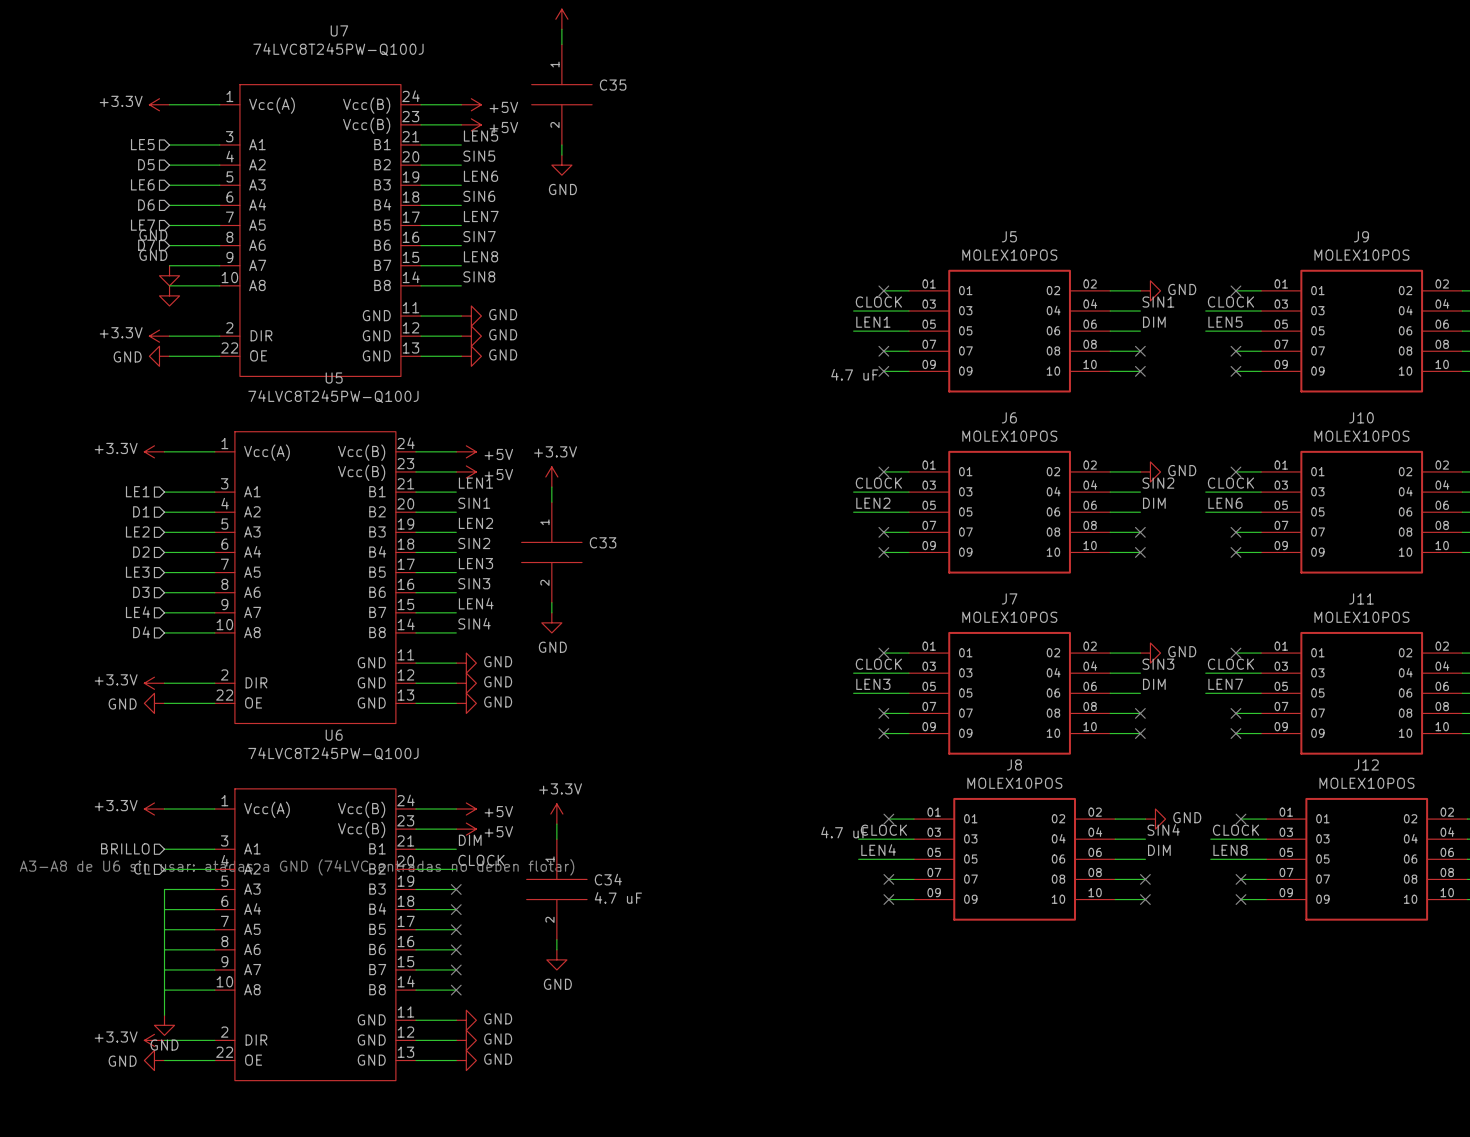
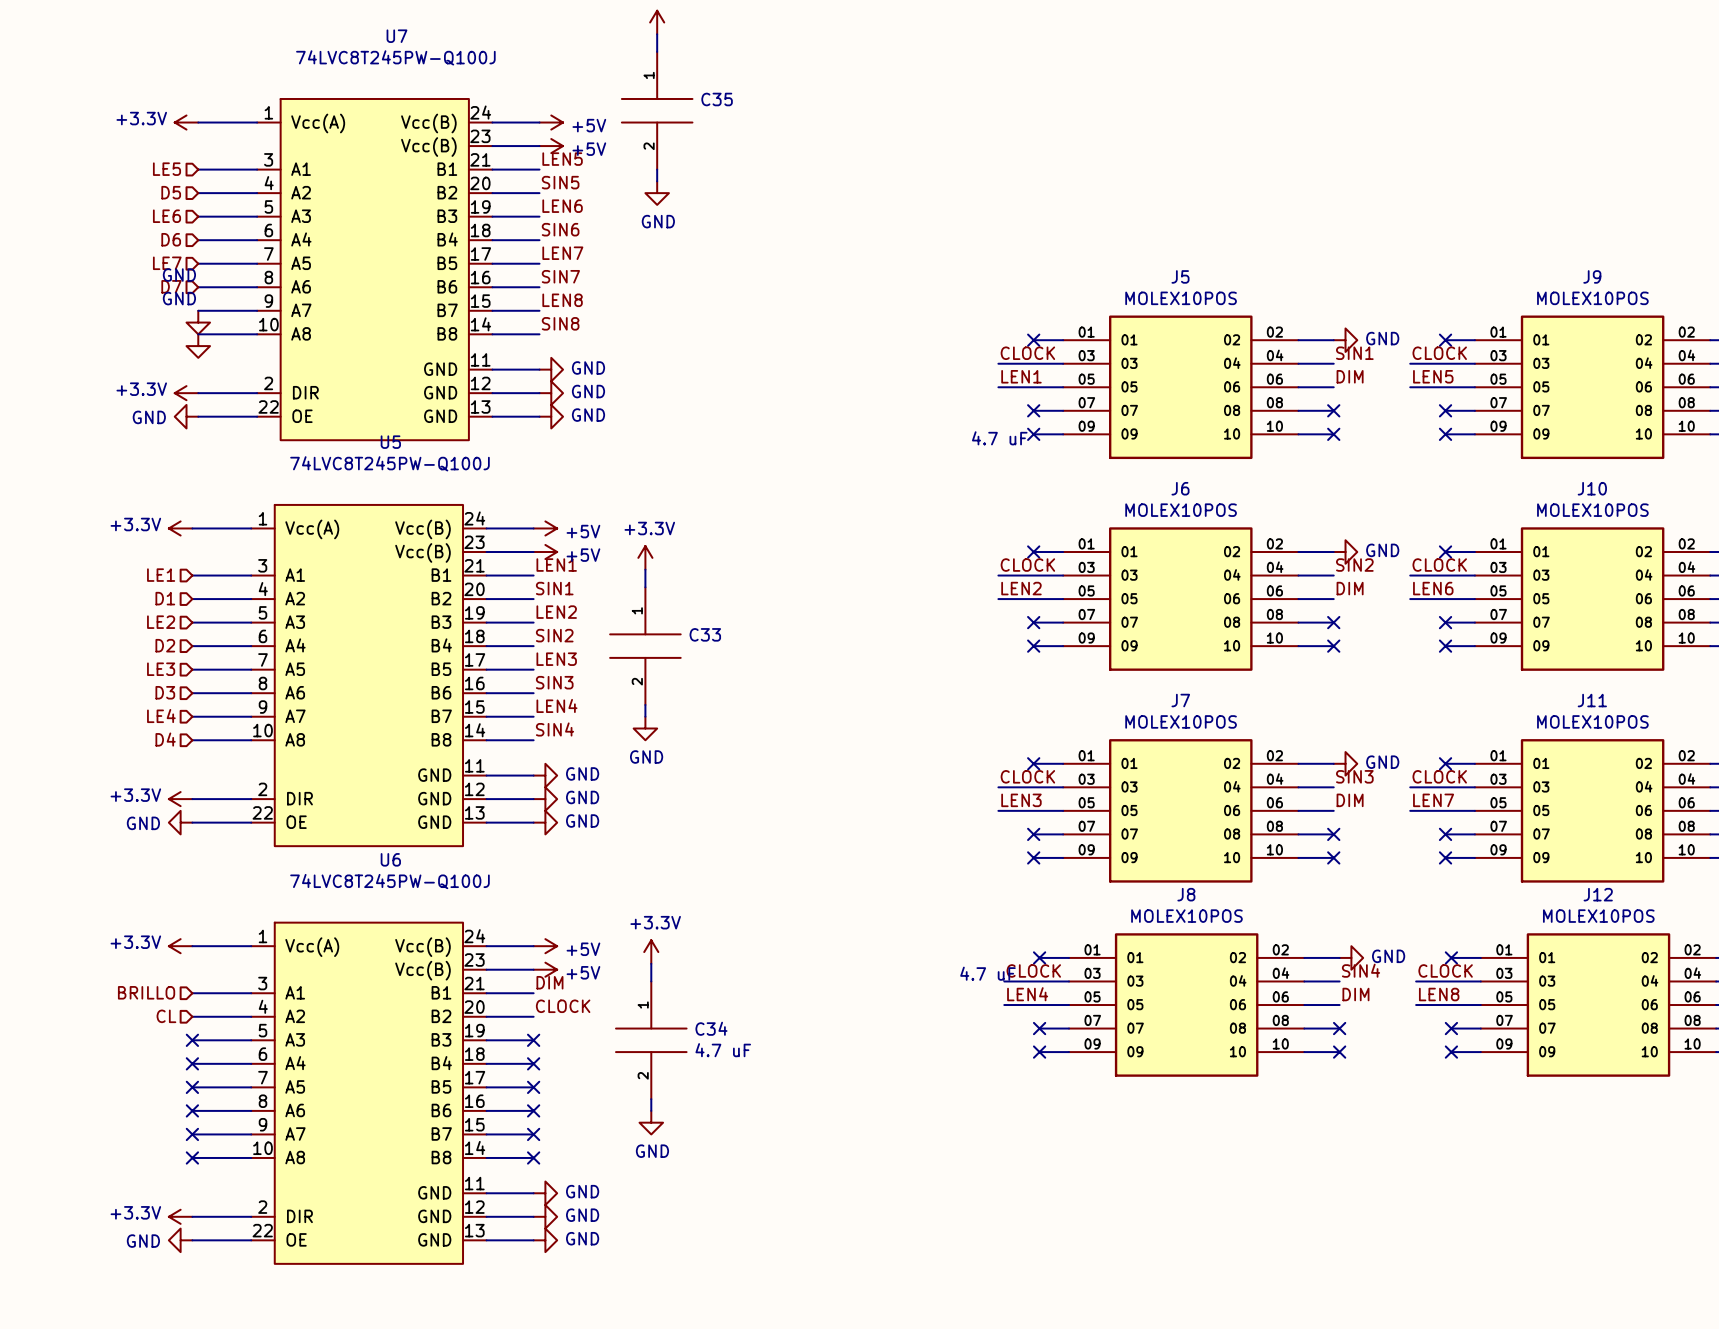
text: A3-A8 de U6 sin usar: atadas a GND (74LVC entradas no deben flotar) (297, 867) -> none
wire: (164, 889) (164, 1015) -> none
no-connect mark: none -> (192, 1040)
no-connect mark: none -> (192, 1063)
no-connect mark: none -> (192, 1087)
no-connect mark: none -> (192, 1110)
no-connect mark: none -> (192, 1134)
no-connect mark: none -> (192, 1157)
power symbol: GND (164, 1025) -> none

